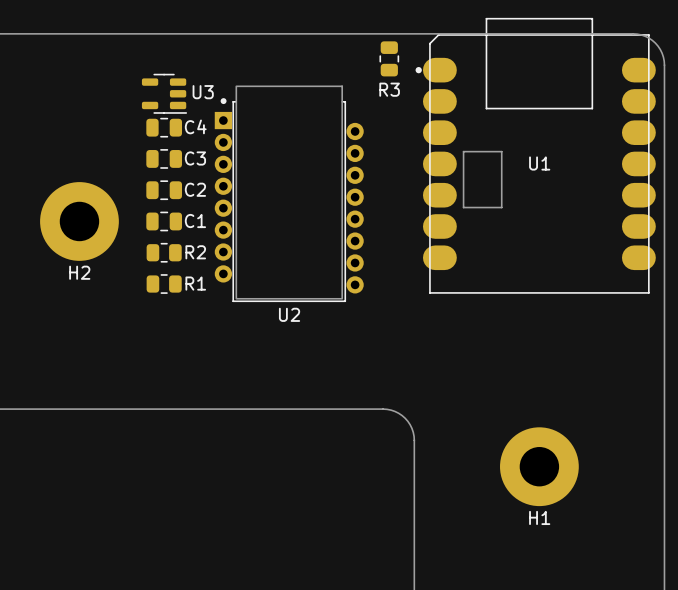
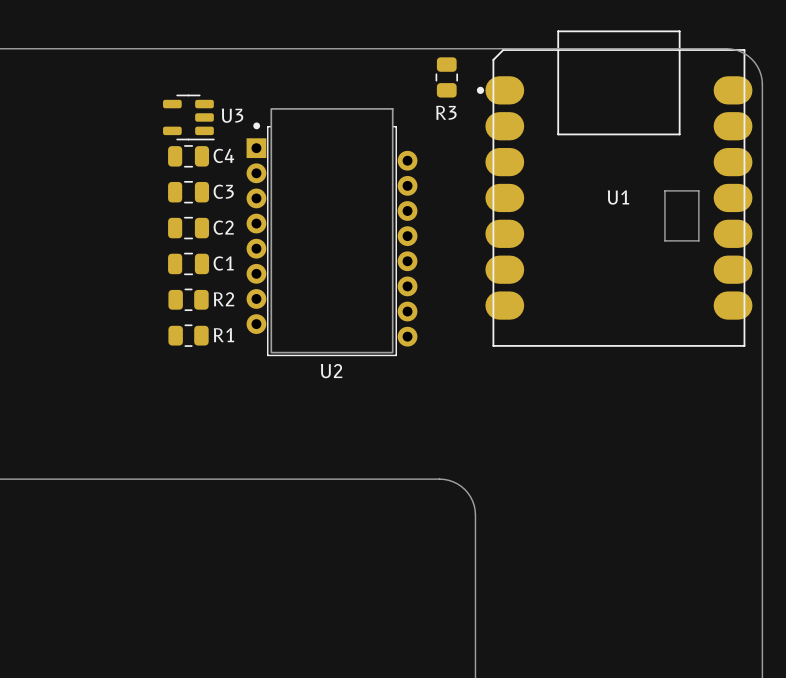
board edge: (501, 151) (463, 151) (463, 207) (501, 207) (501, 151) -> none
board edge: none -> (698, 190) (698, 240) (664, 240) (664, 190) (698, 190)
H2: (79, 221) -> none
H1: (539, 466) -> none

